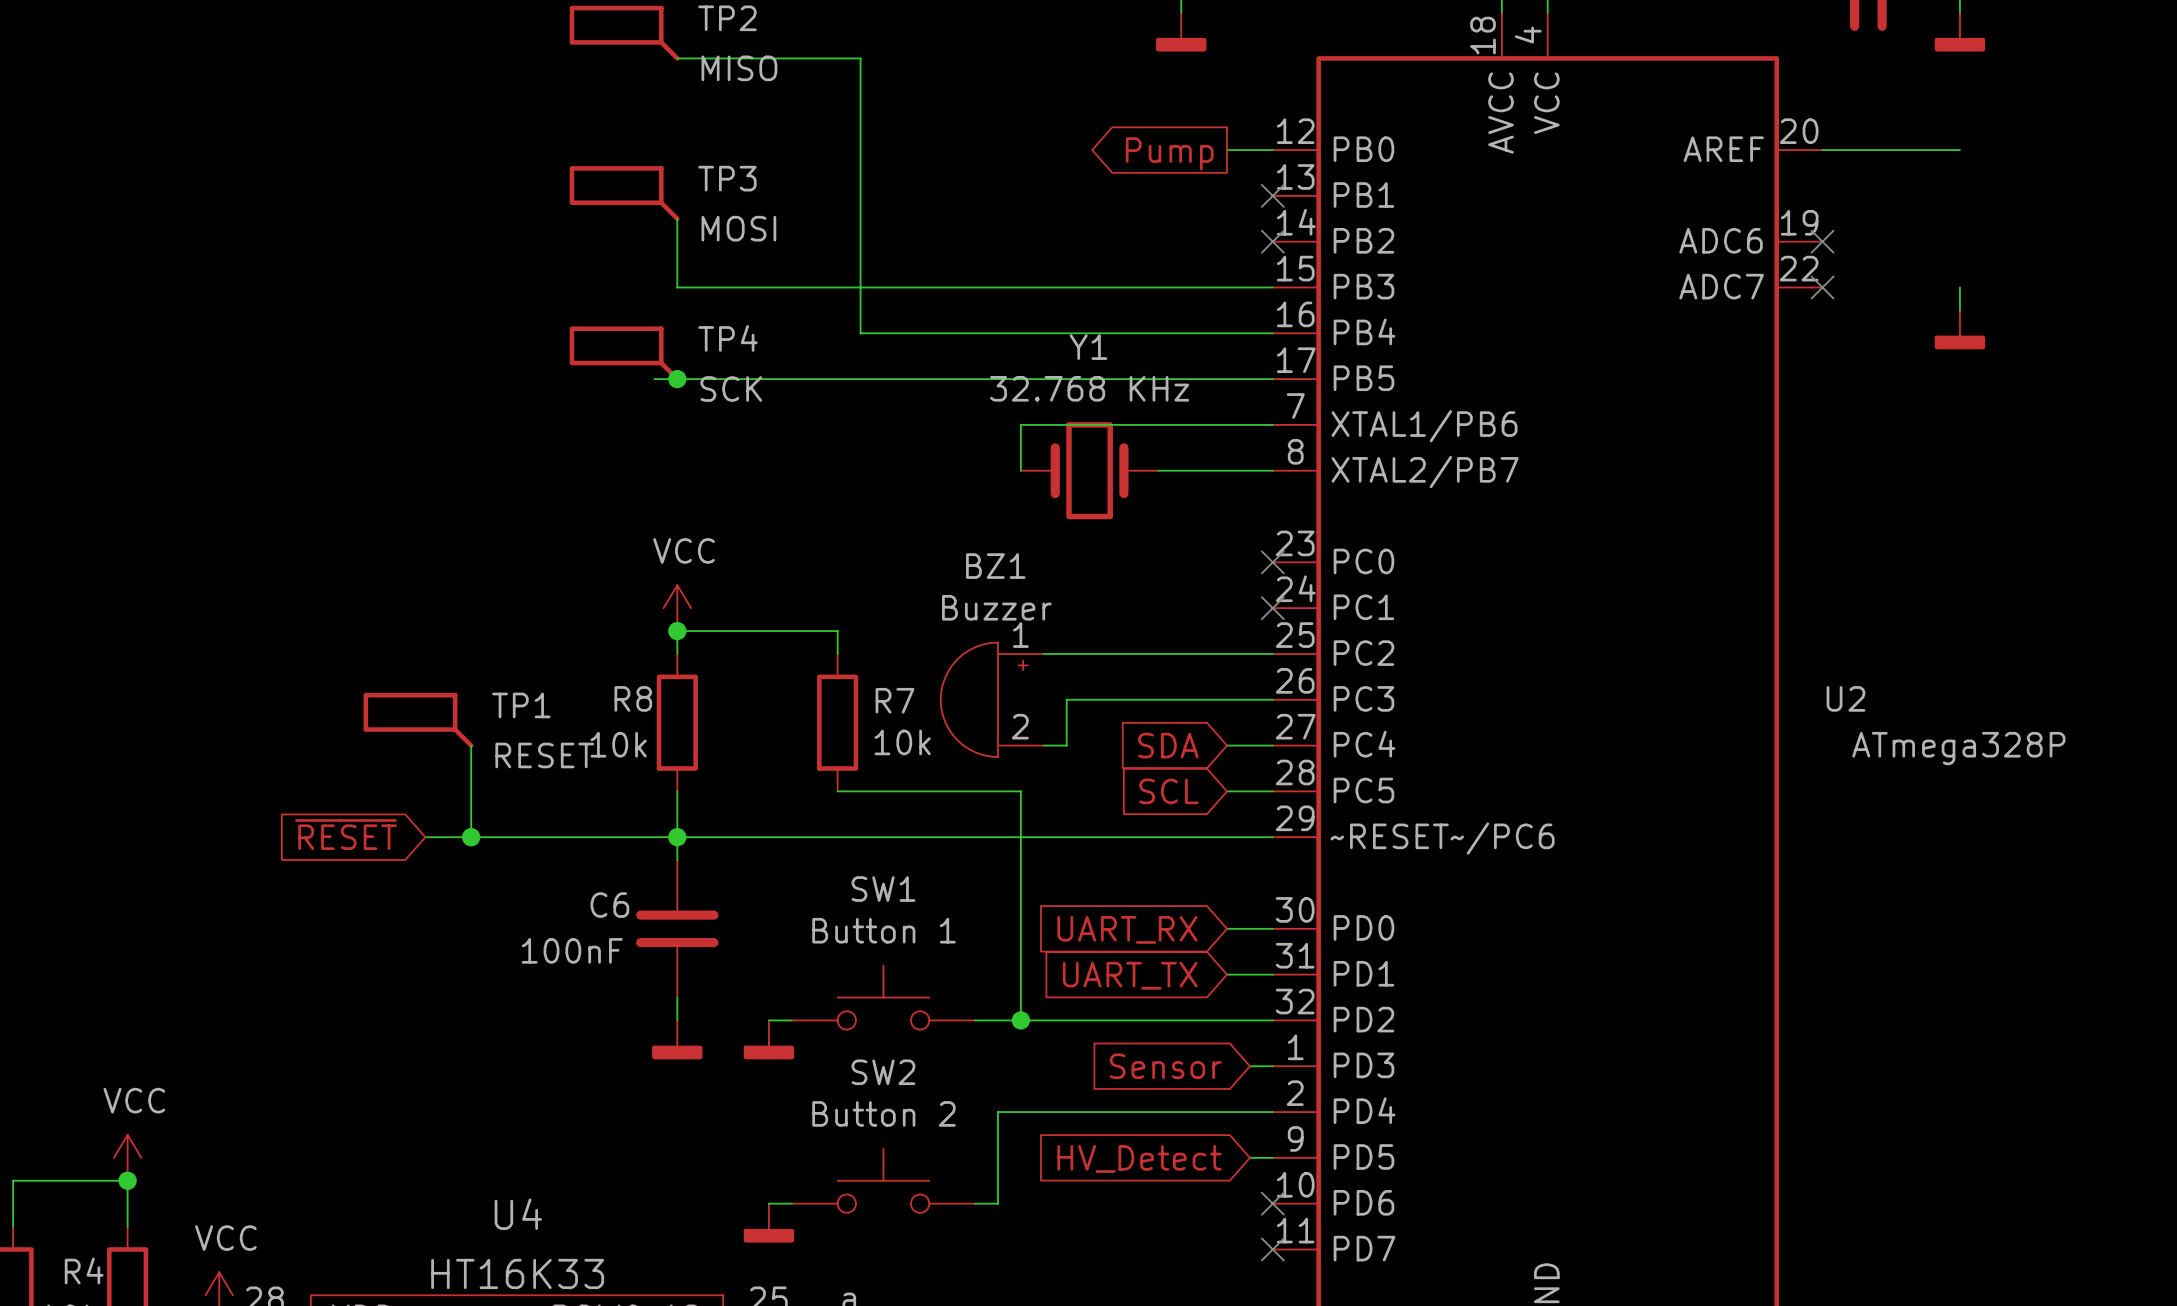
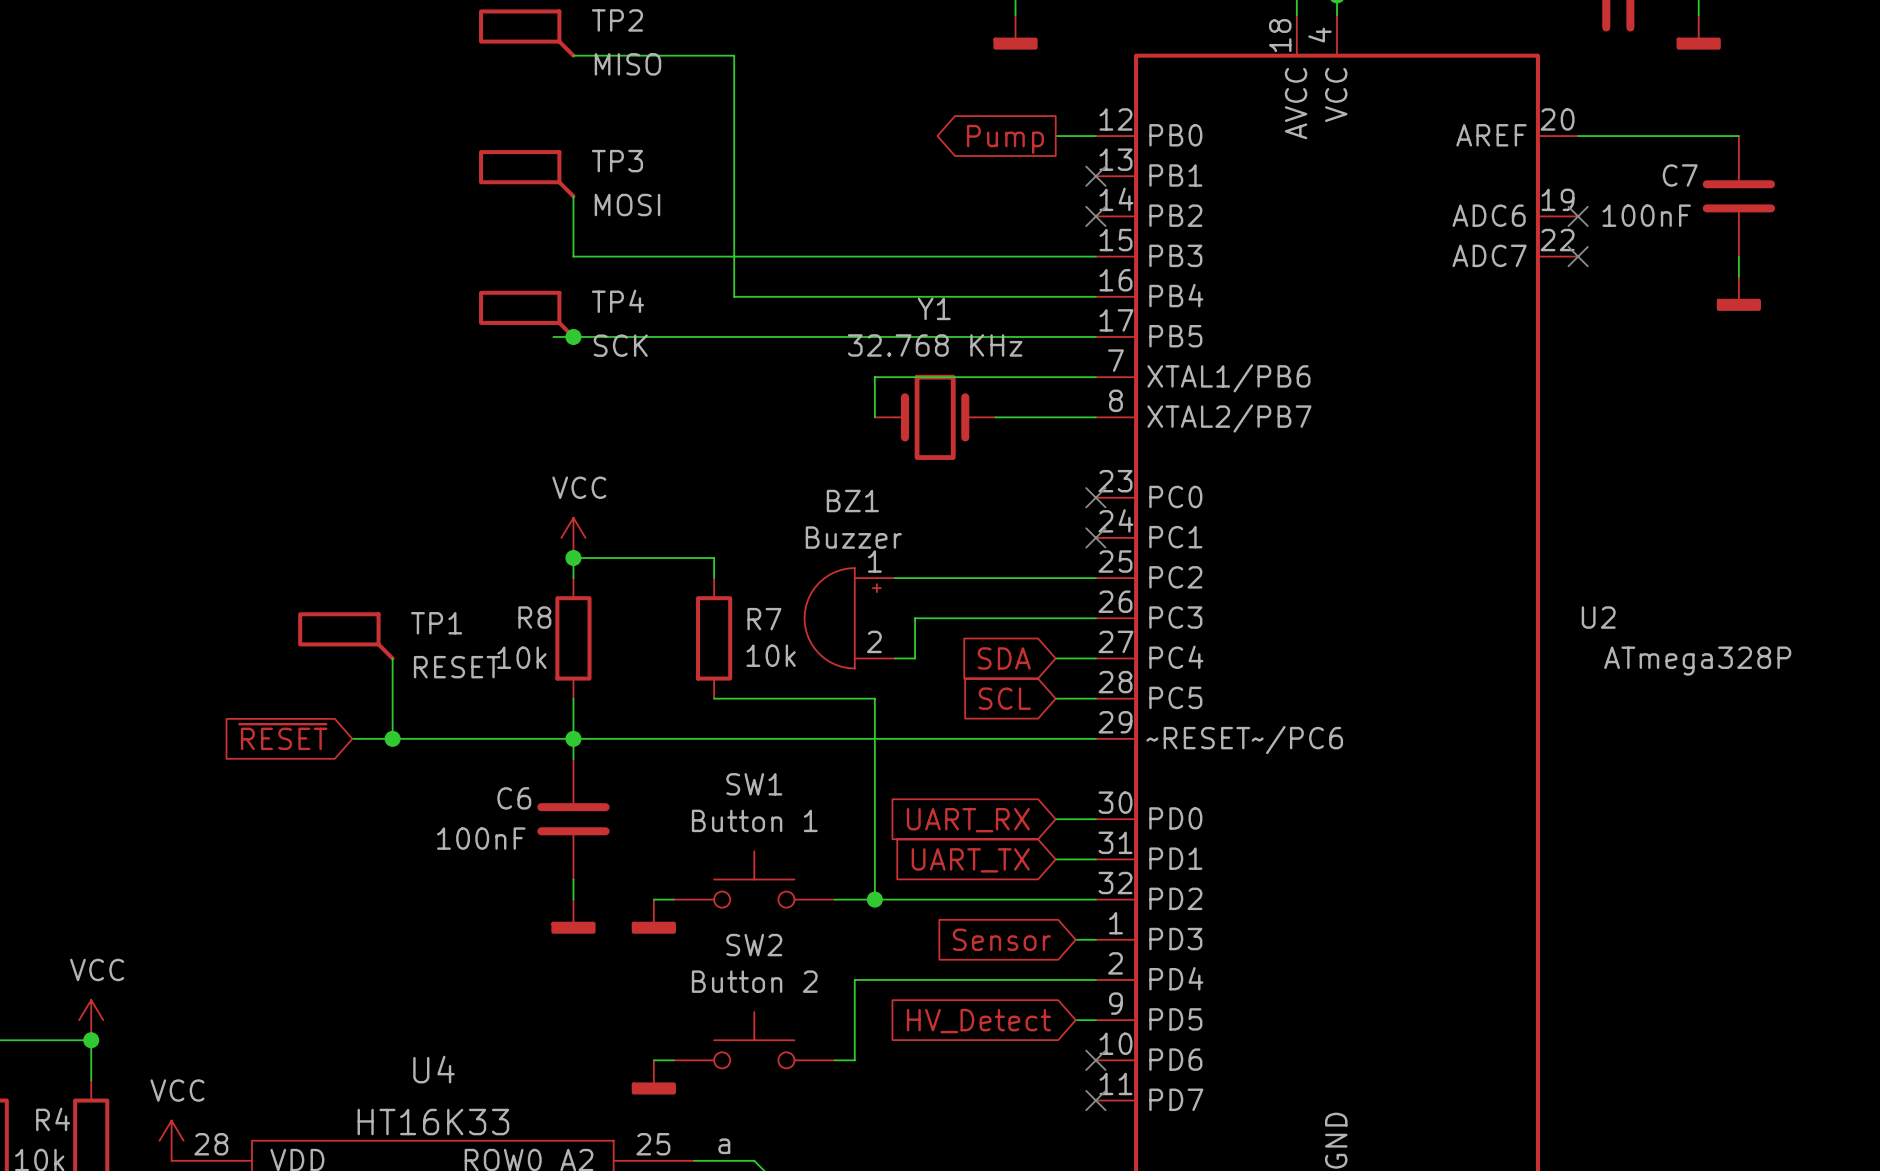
wire: none -> (1698, 136) (1738, 136)
C7: none -> 100nF (1738, 196)
wire: (1959, 287) (1959, 310) -> (1738, 256) (1738, 276)
power symbol position: (1959, 329) -> (1738, 293)

